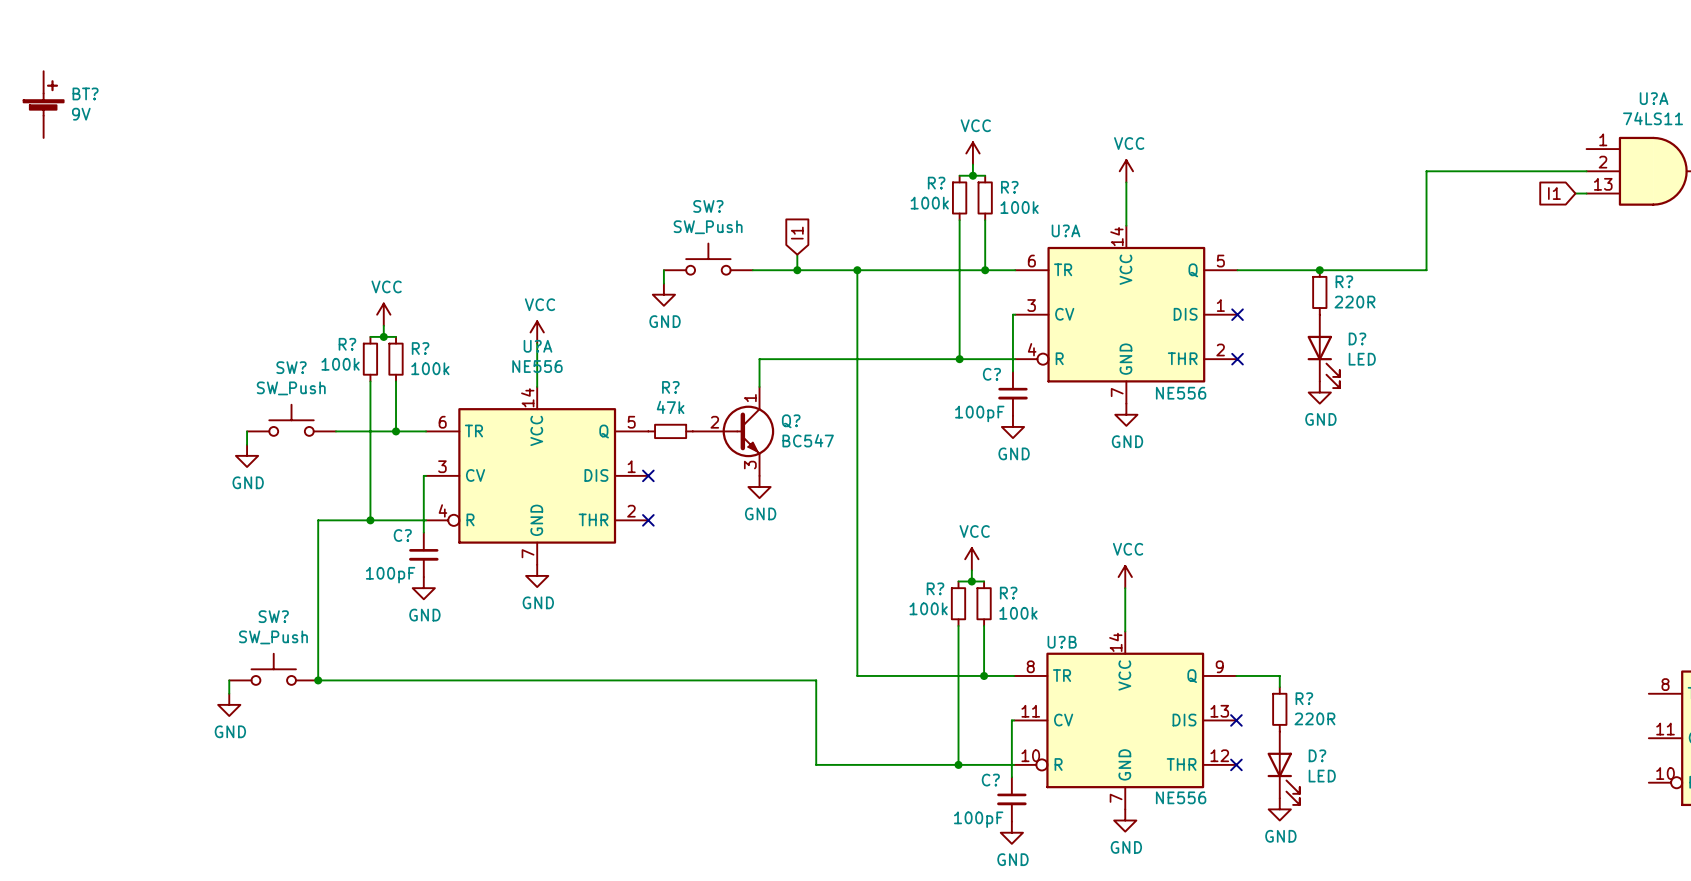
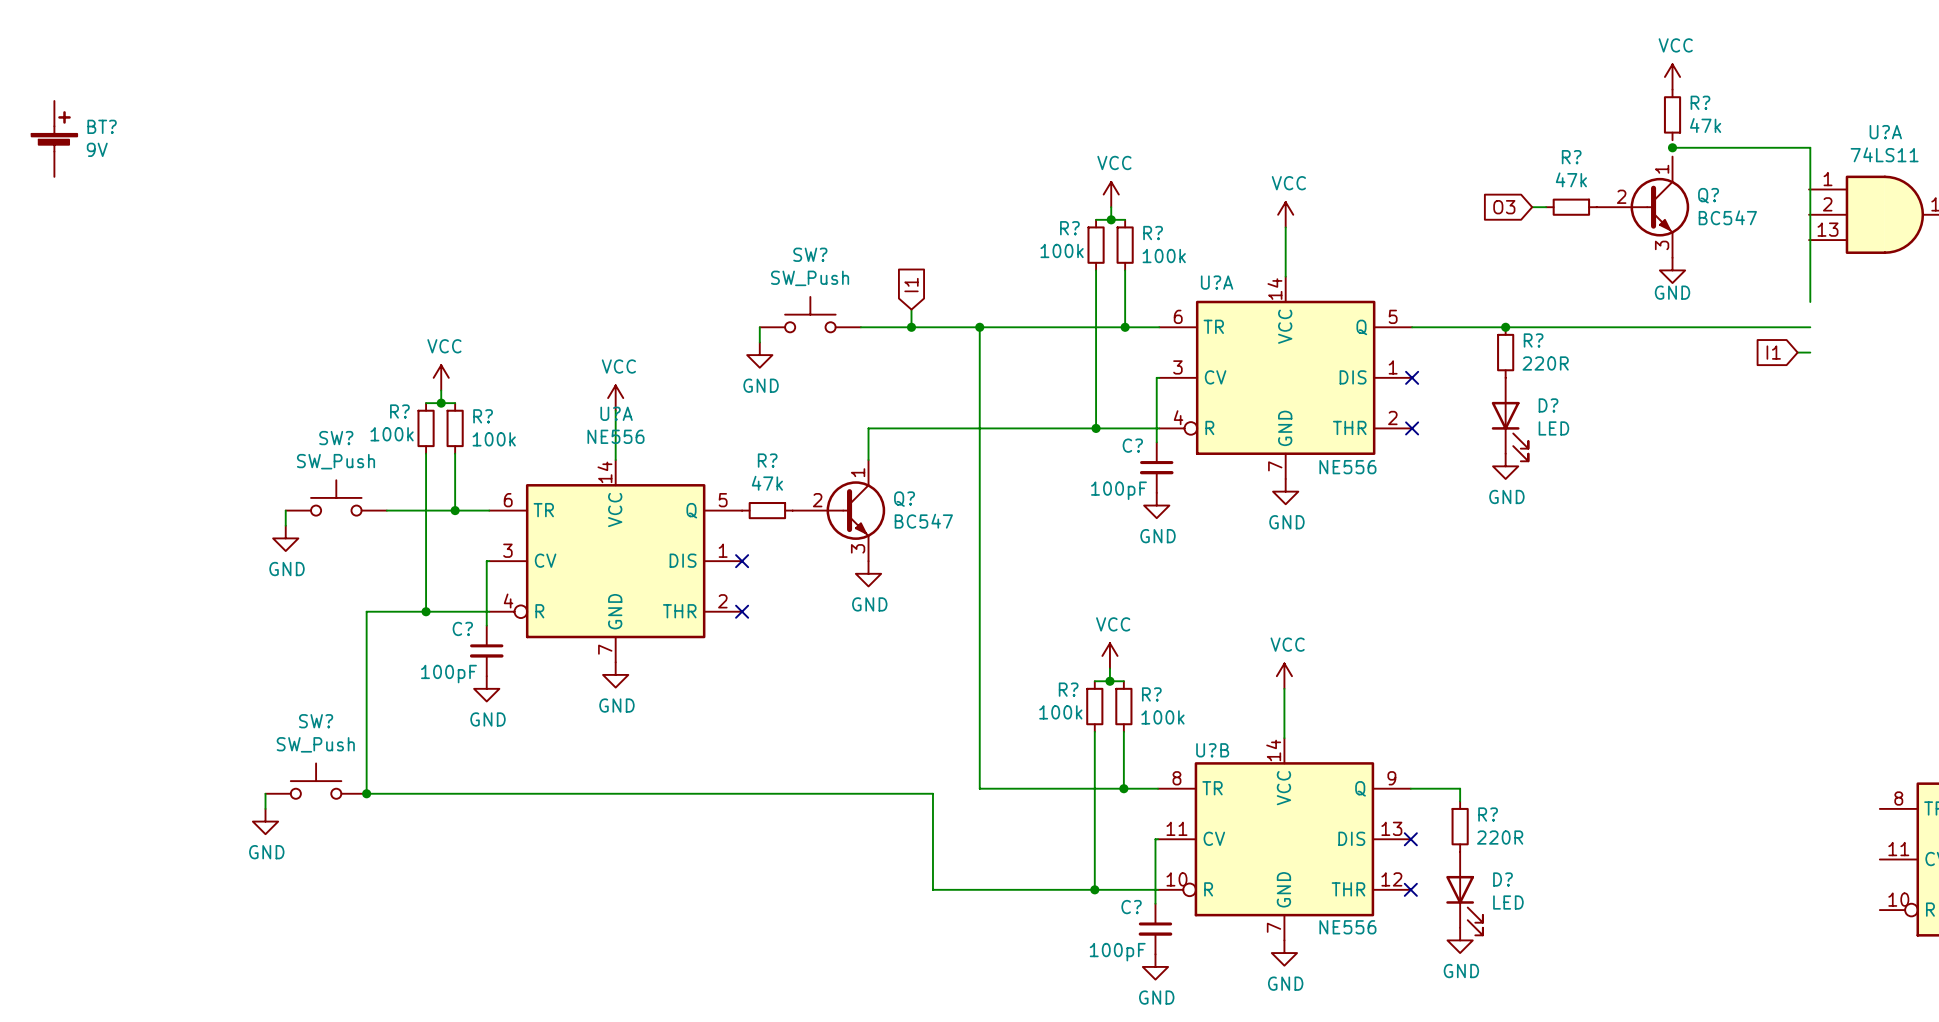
power symbol: none -> VCC (1672, 76)
R?: none -> 47k (1672, 114)
wire: none -> (1672, 147) (1810, 147) (1810, 302)
junction: none -> (1672, 147)
global label: none -> O3 (1504, 207)
wire: none -> (1532, 207) (1546, 207)
R?: none -> 47k (1571, 207)
Q?: none -> BC547 (1642, 207)
wire: (1586, 171) (1426, 171) (1426, 270) -> (1810, 327) (1627, 327)
global label position: I1 (1554, 193) -> I1 (1773, 352)
wire: (1575, 193) (1586, 193) -> (1797, 352) (1810, 352)
power symbol: none -> GND (1672, 270)

